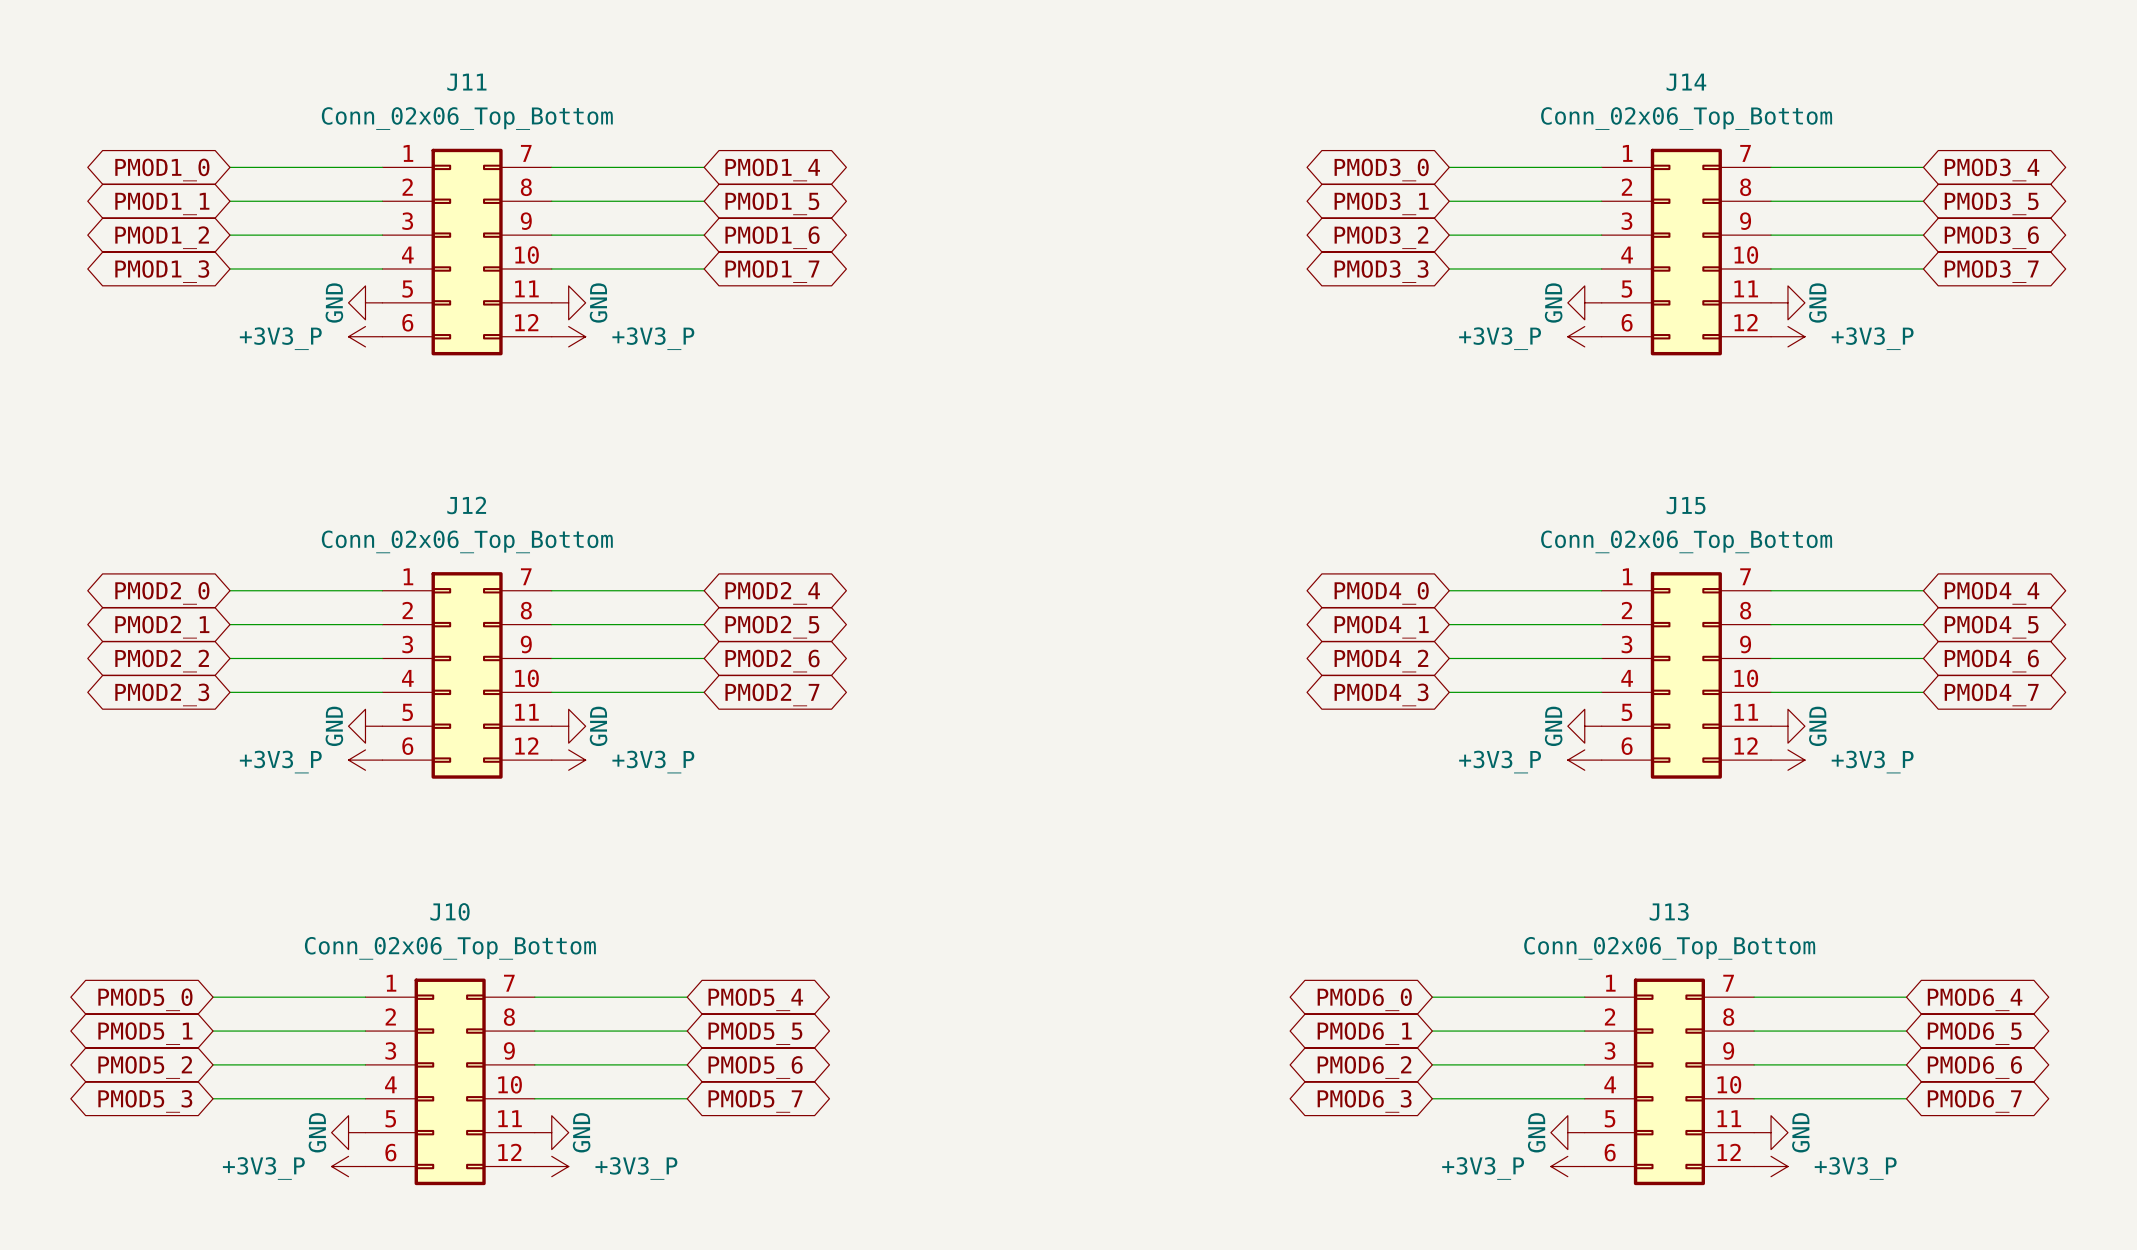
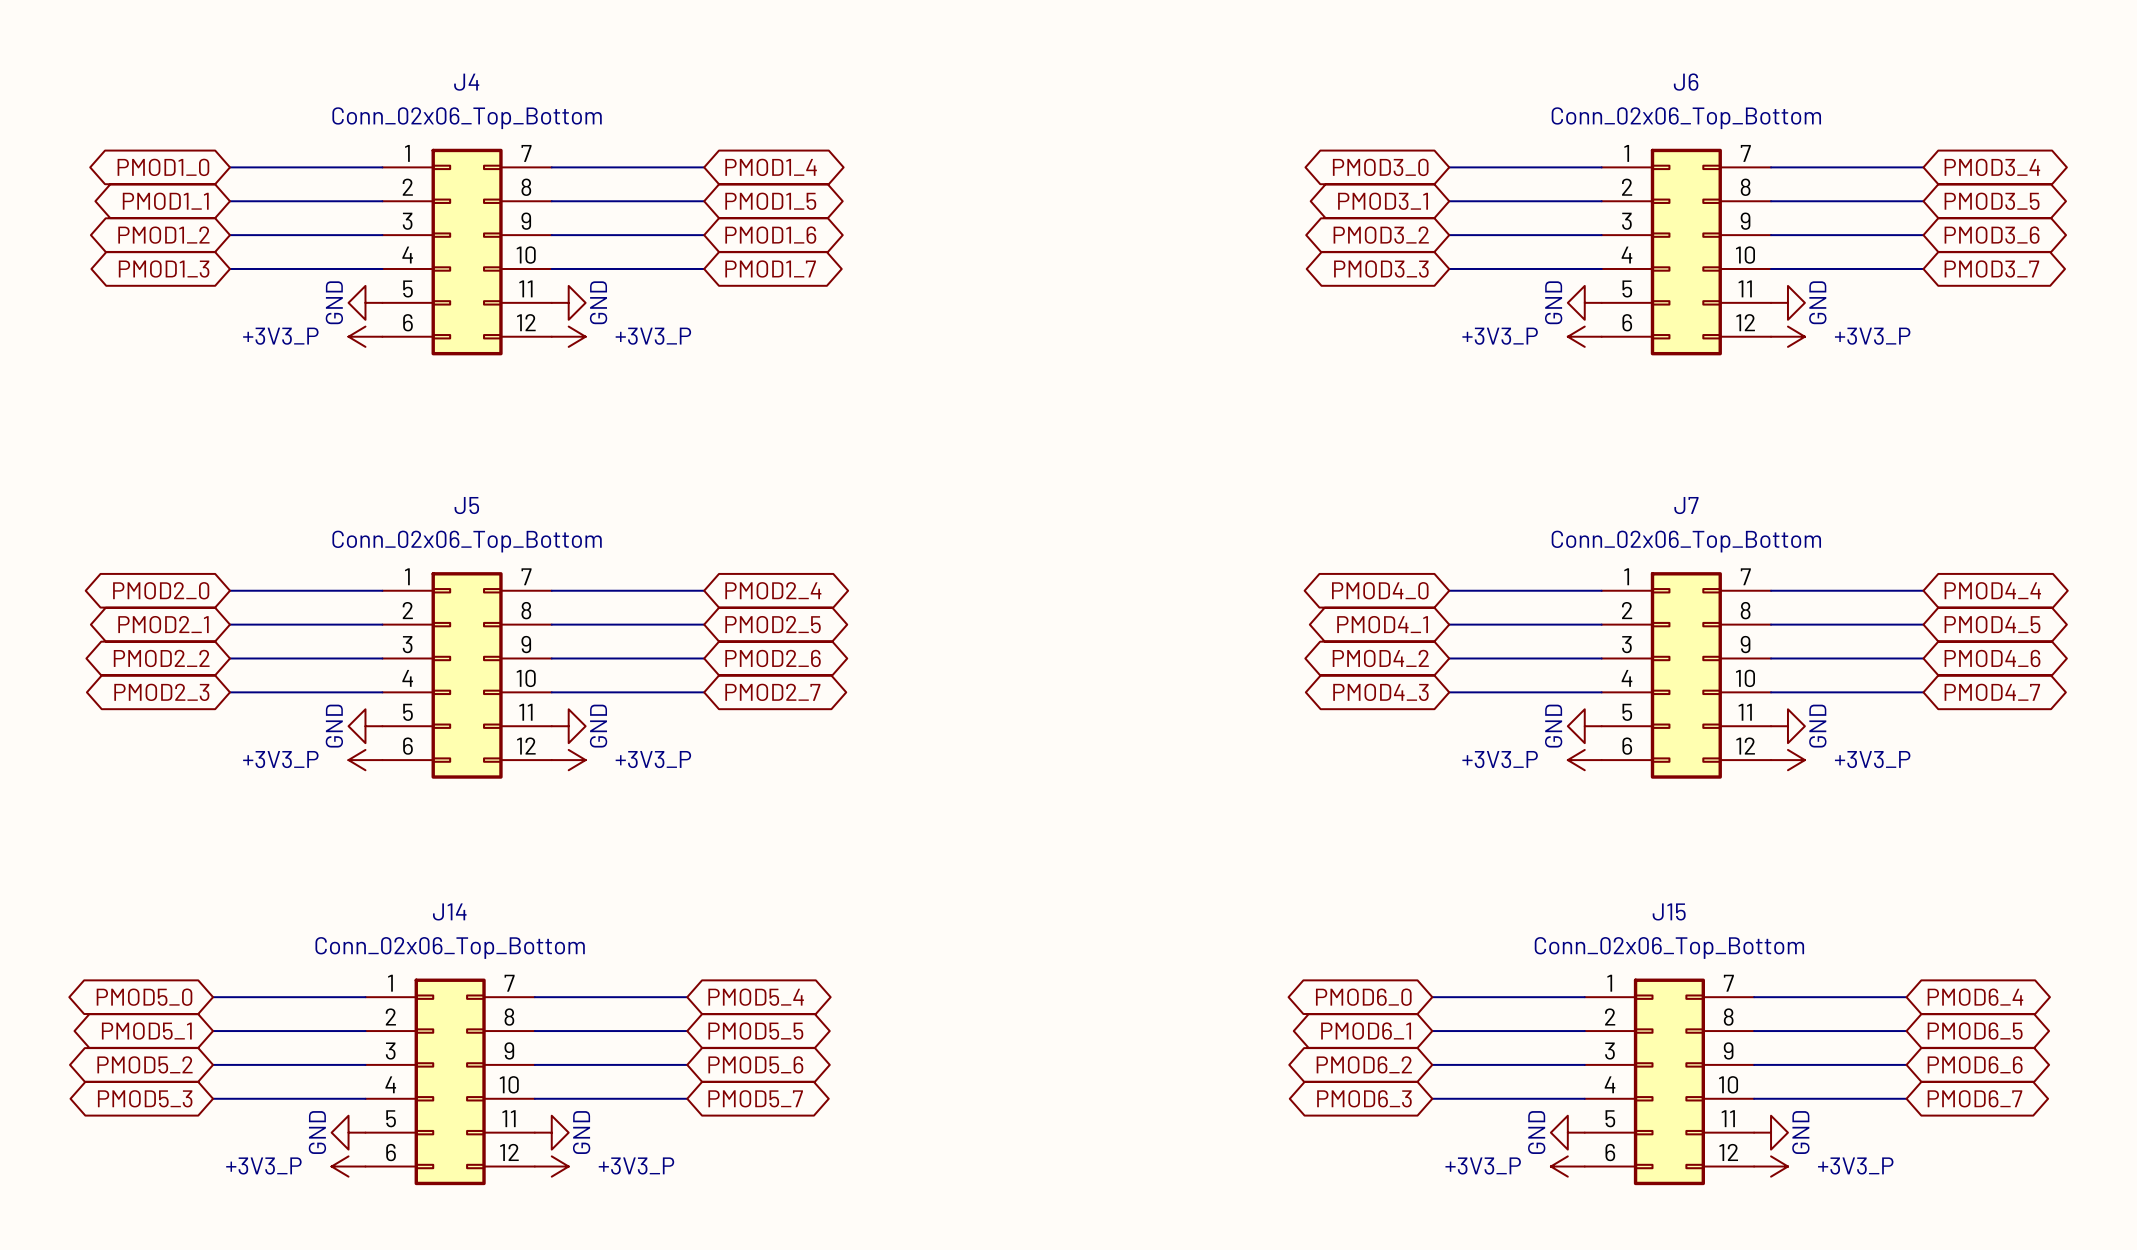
J11 name: J11 (466, 82) -> J4 (466, 82)
J14 name: J14 (1686, 82) -> J6 (1686, 82)
J12 name: J12 (466, 505) -> J5 (466, 505)
J15 name: J15 (1686, 505) -> J7 (1686, 505)
J10 name: J10 (450, 911) -> J14 (449, 911)
J13 name: J13 (1669, 911) -> J15 (1669, 911)

